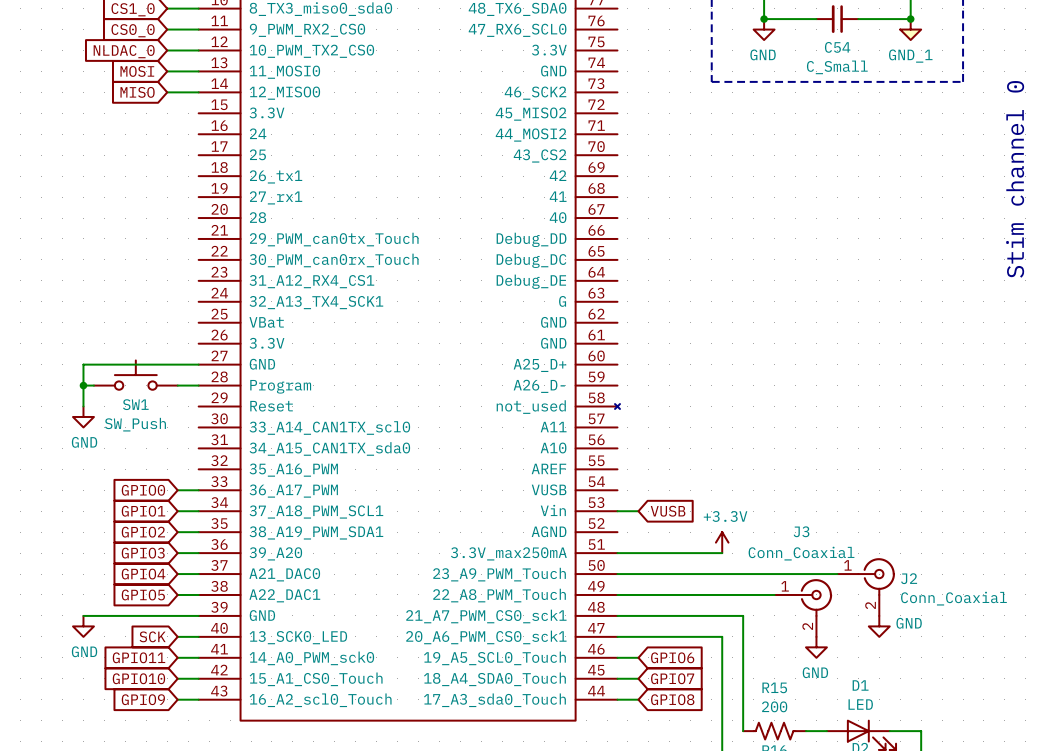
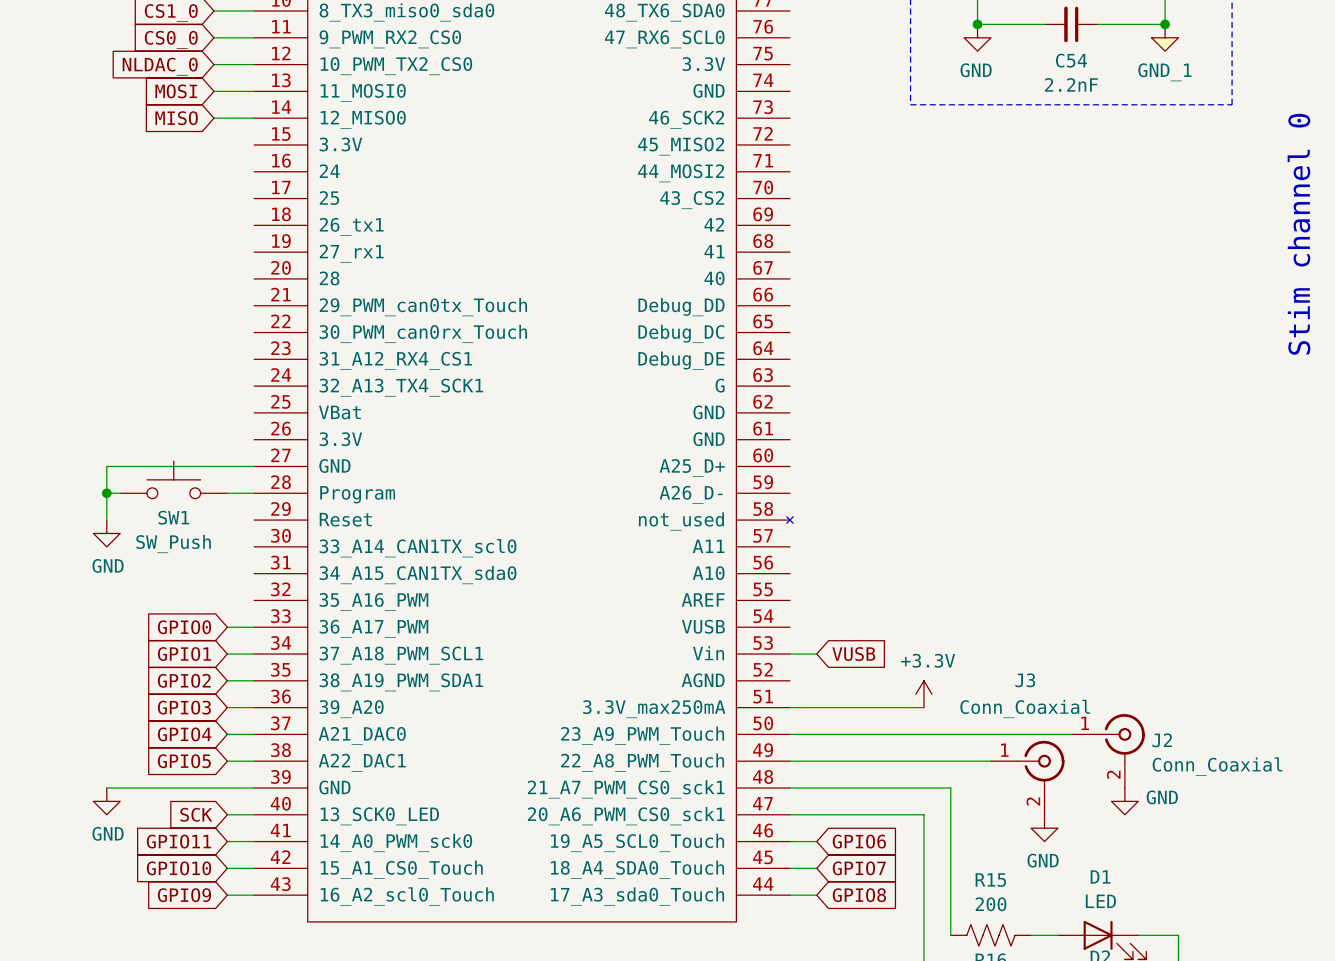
C54 value: C_Small (837, 67) -> 2.2nF (1071, 84)

